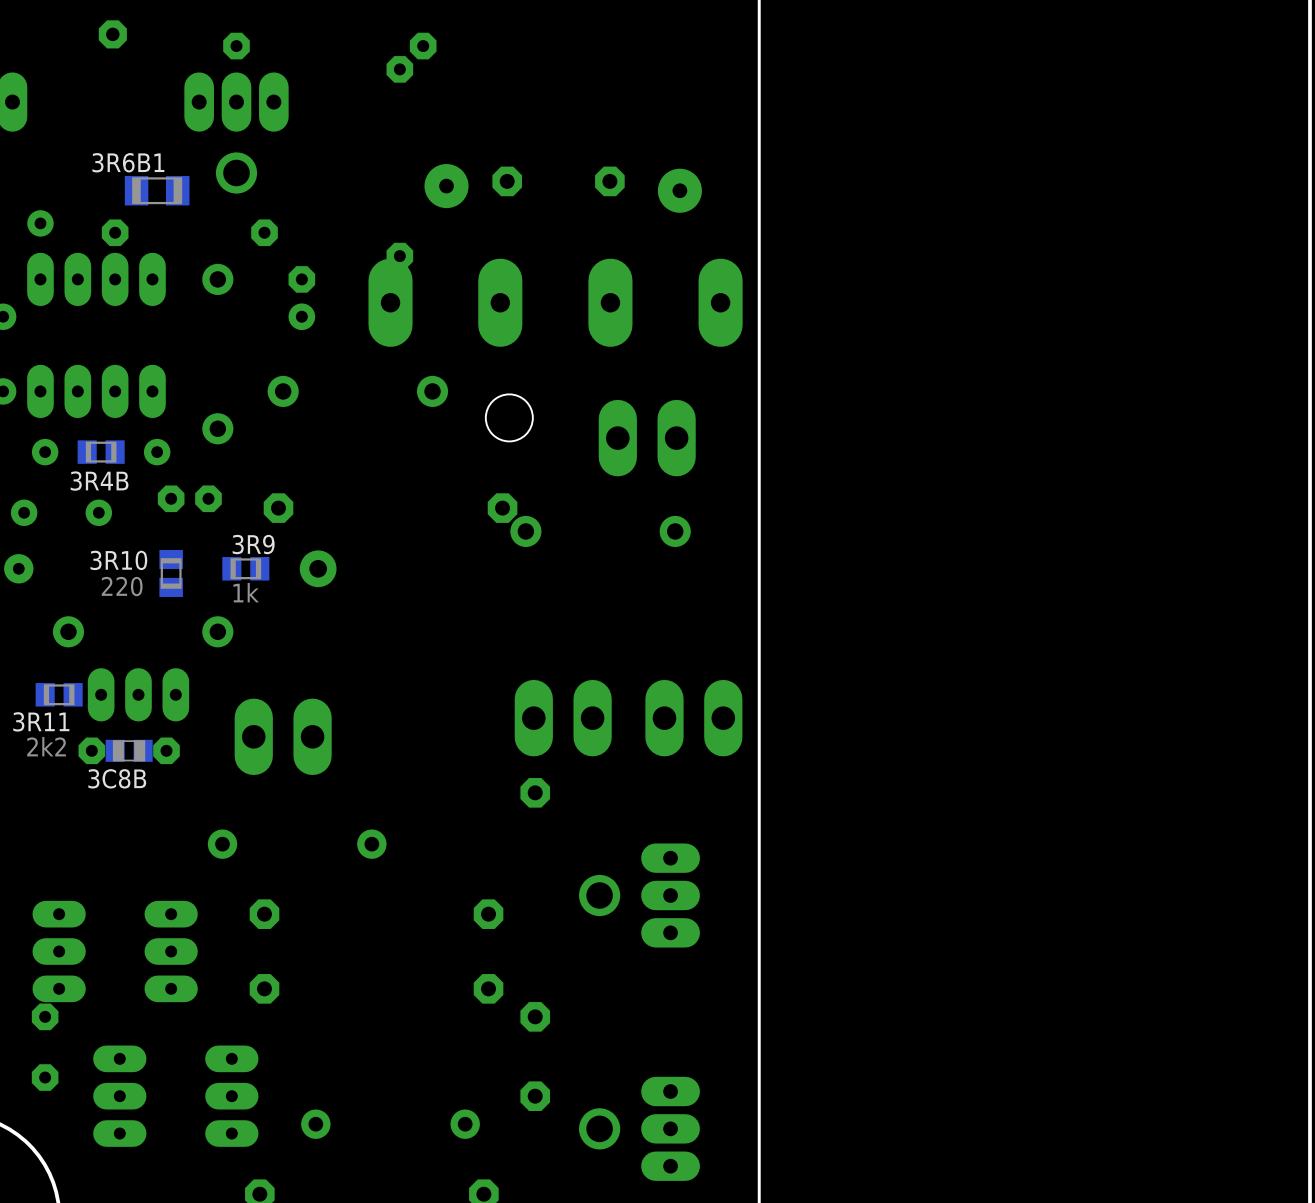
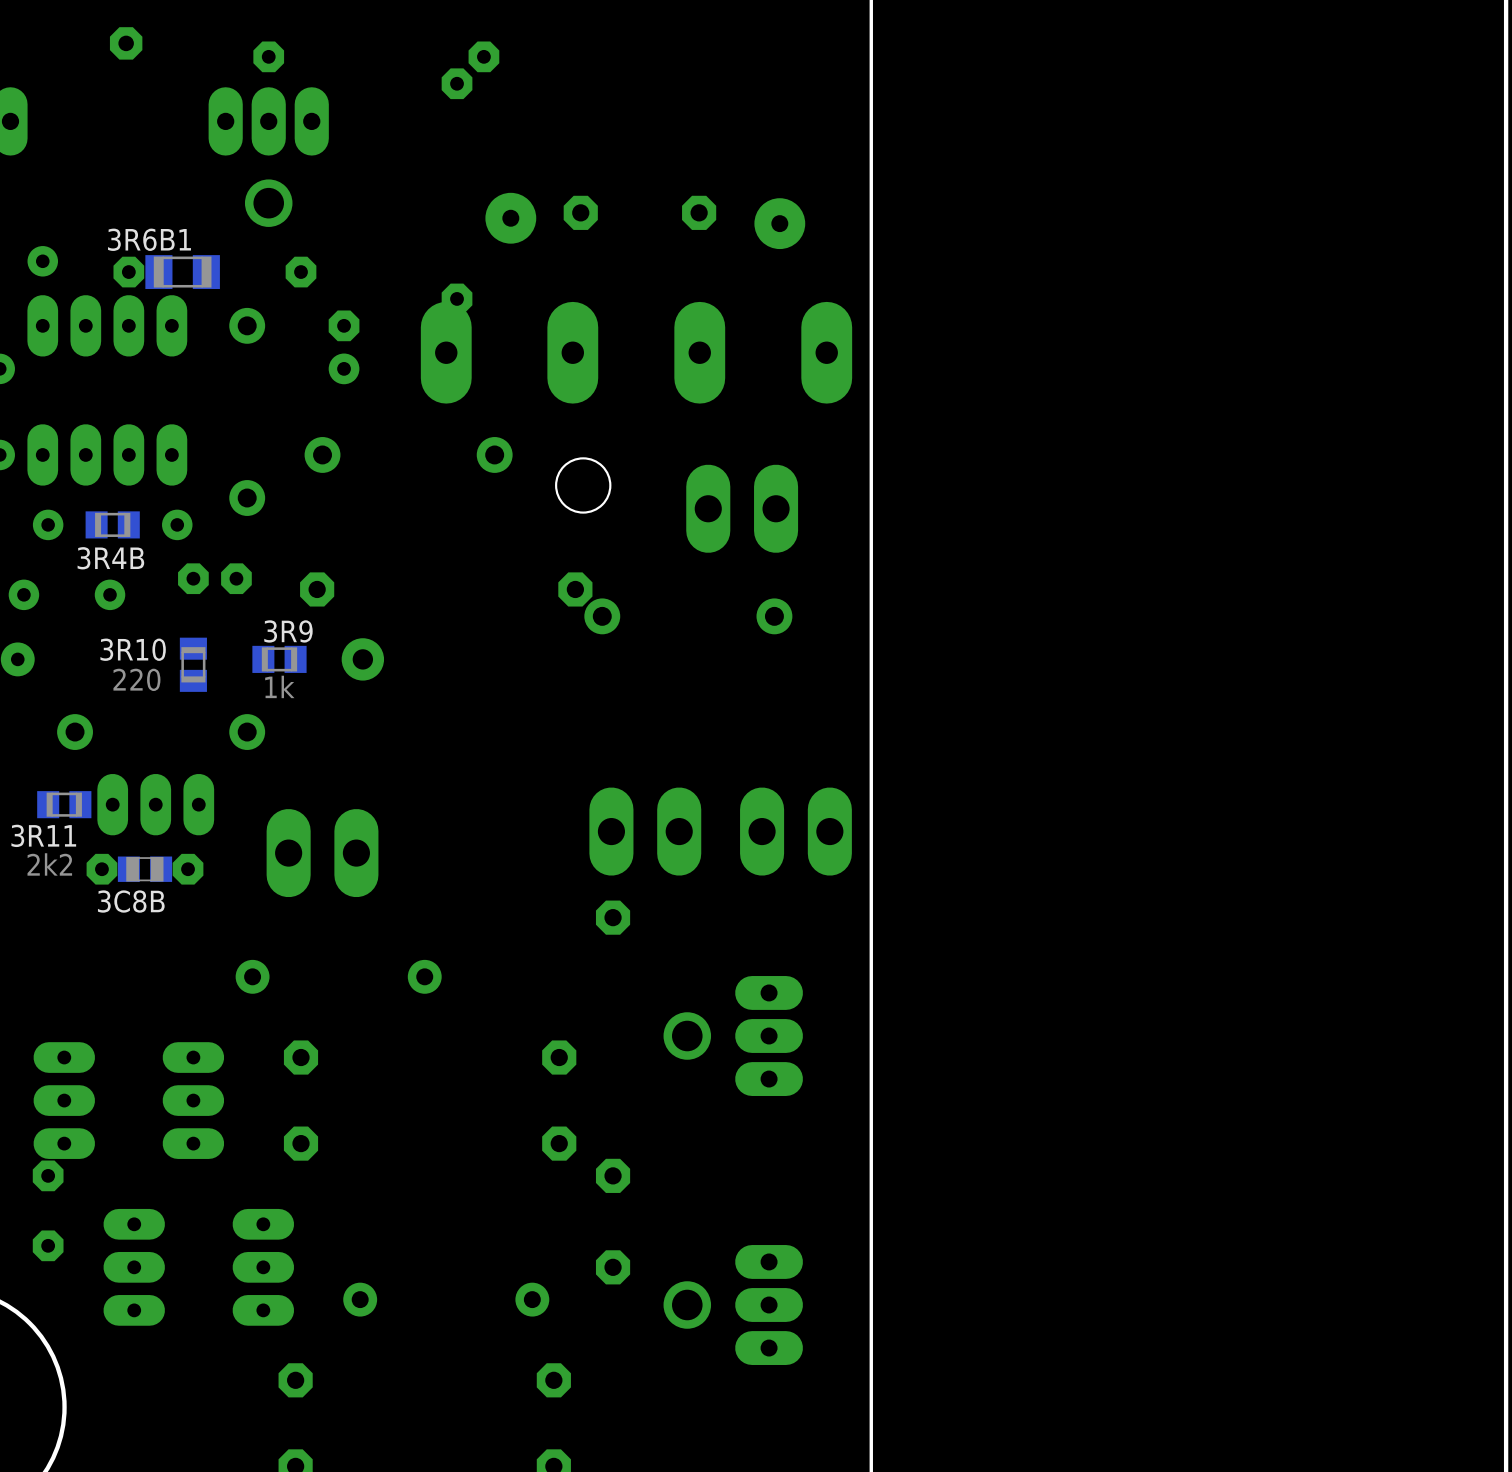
3R6B1 position: (157, 190) -> (182, 272)

